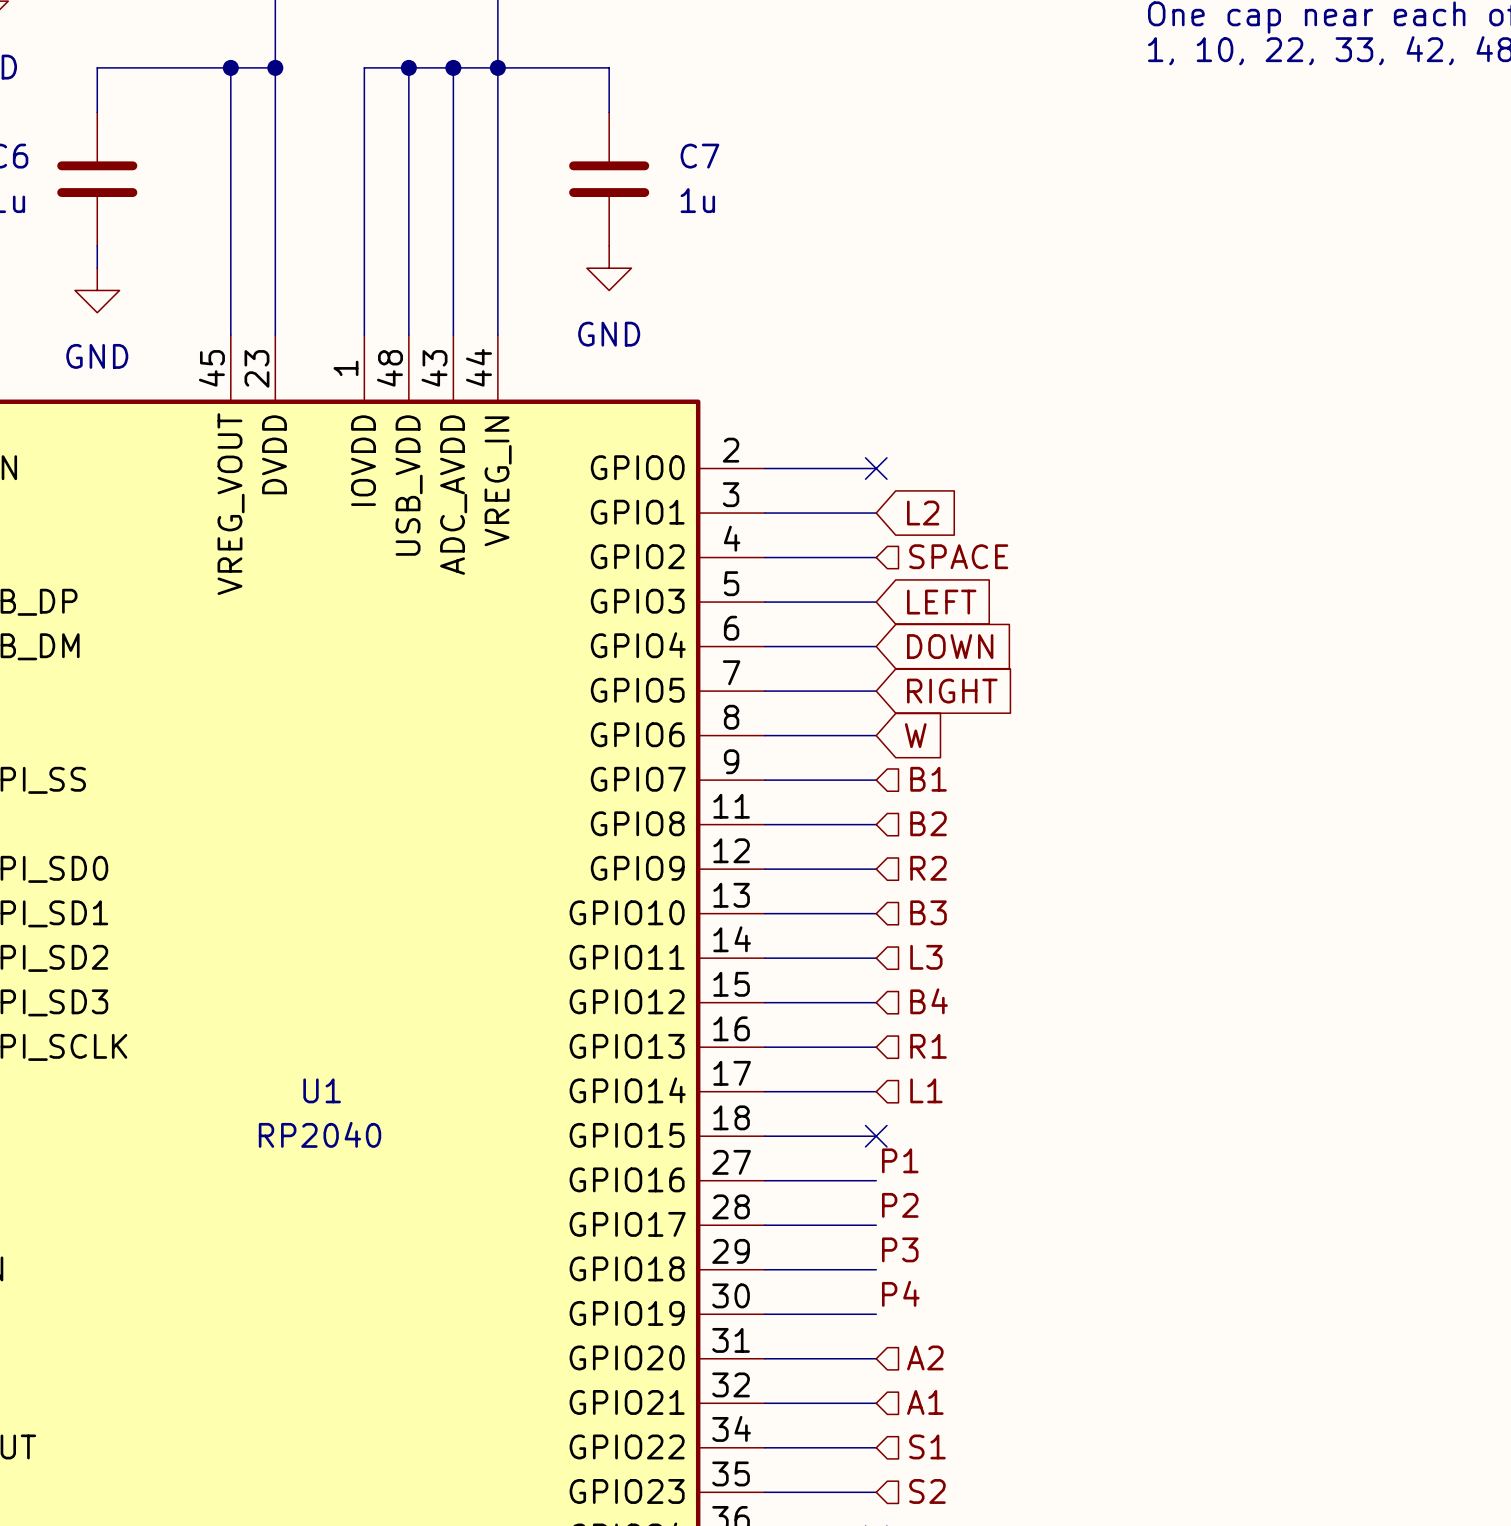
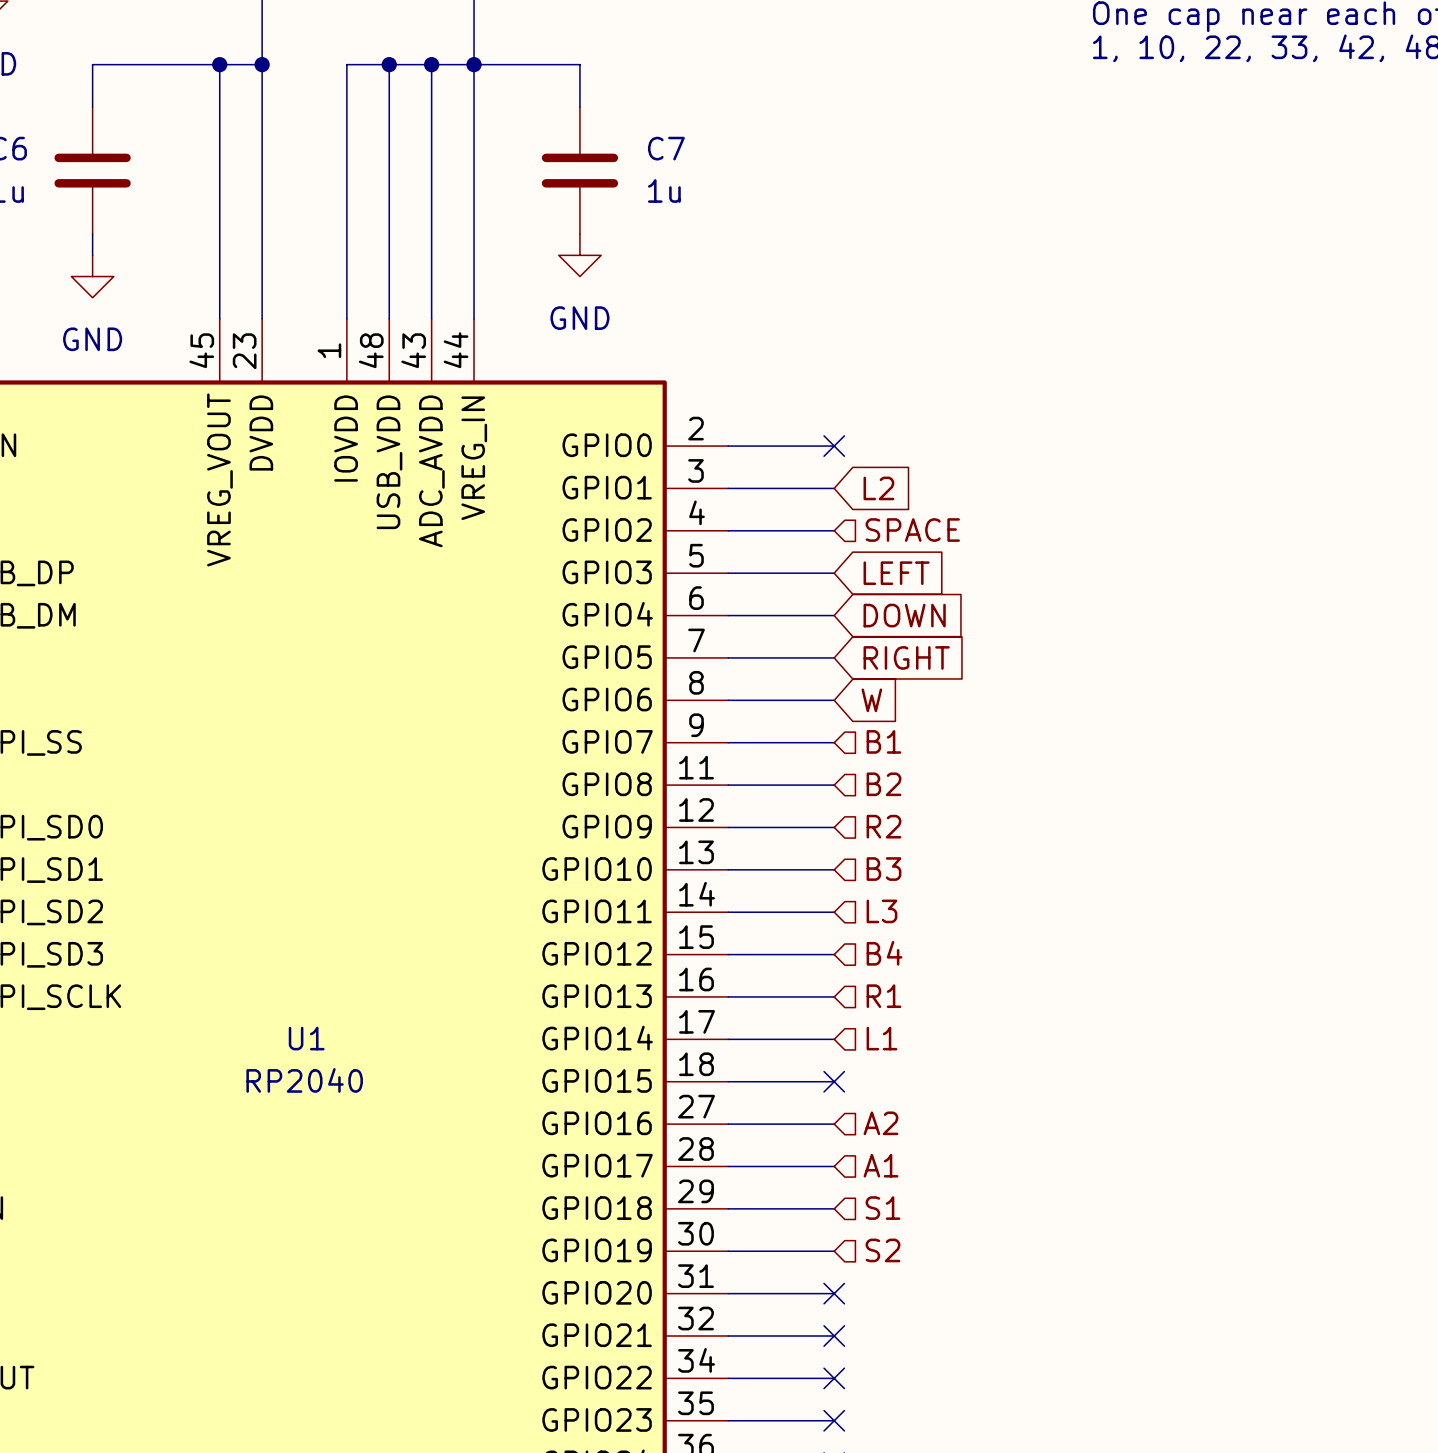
label: P1 (900, 1160) -> none
label: P2 (900, 1205) -> none
label: P3 (900, 1249) -> none
label: P4 (900, 1293) -> none
hierarchical label position: A2 (925, 1357) -> A2 (880, 1123)
no-connect mark: none -> (834, 1293)
hierarchical label position: A1 (925, 1402) -> A1 (880, 1165)
no-connect mark: none -> (834, 1336)
hierarchical label position: S1 (927, 1446) -> S1 (882, 1208)
no-connect mark: none -> (834, 1378)
hierarchical label position: S2 (927, 1491) -> S2 (882, 1250)
no-connect mark: none -> (834, 1420)

